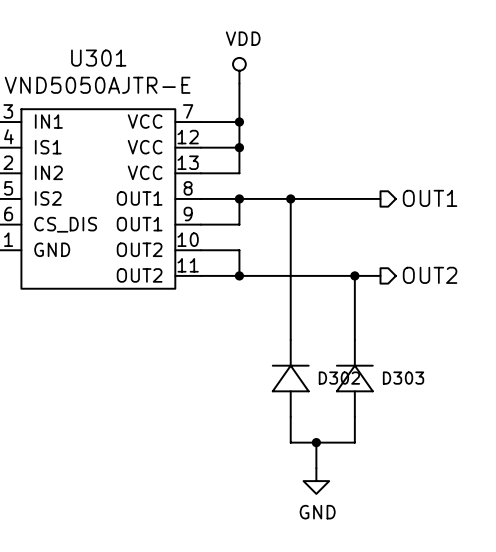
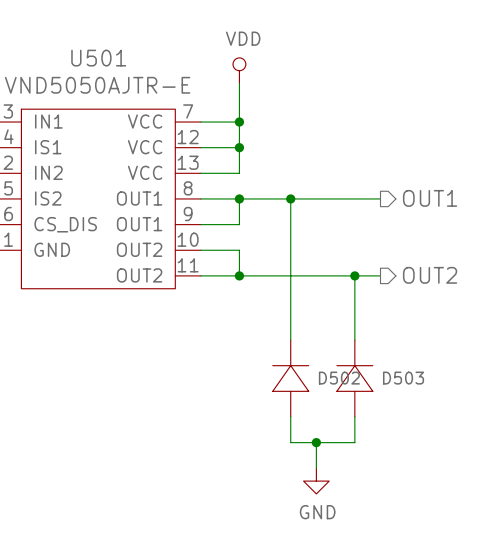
U301 name: U301 (98, 58) -> U501 (98, 58)
D302 name: D302 (339, 378) -> D502 (339, 378)
D303 name: D303 (403, 378) -> D503 (403, 378)

